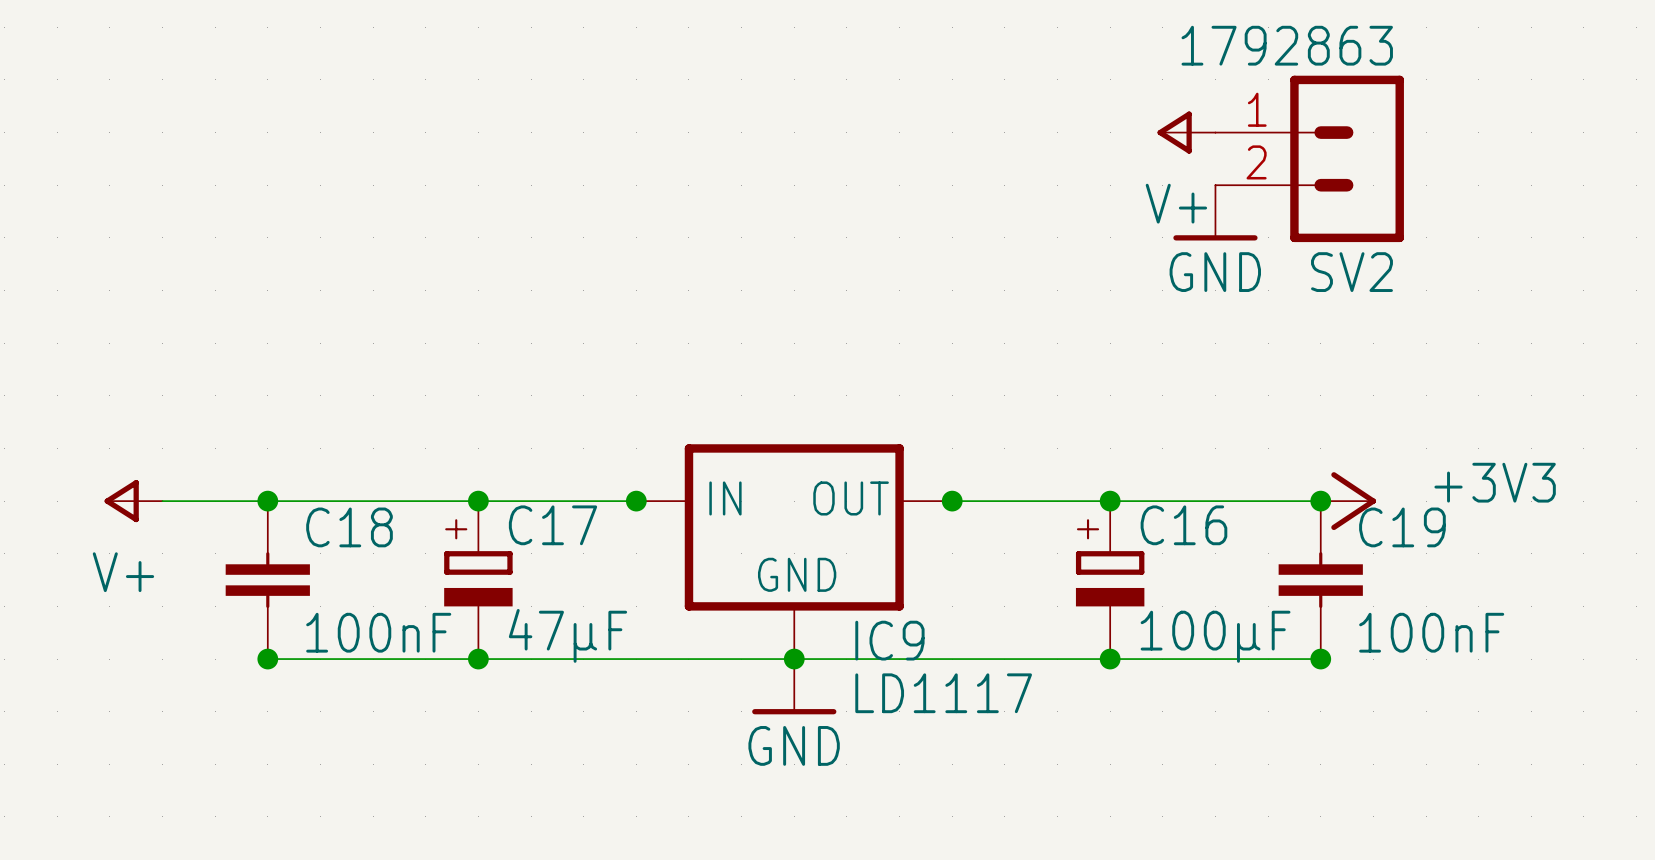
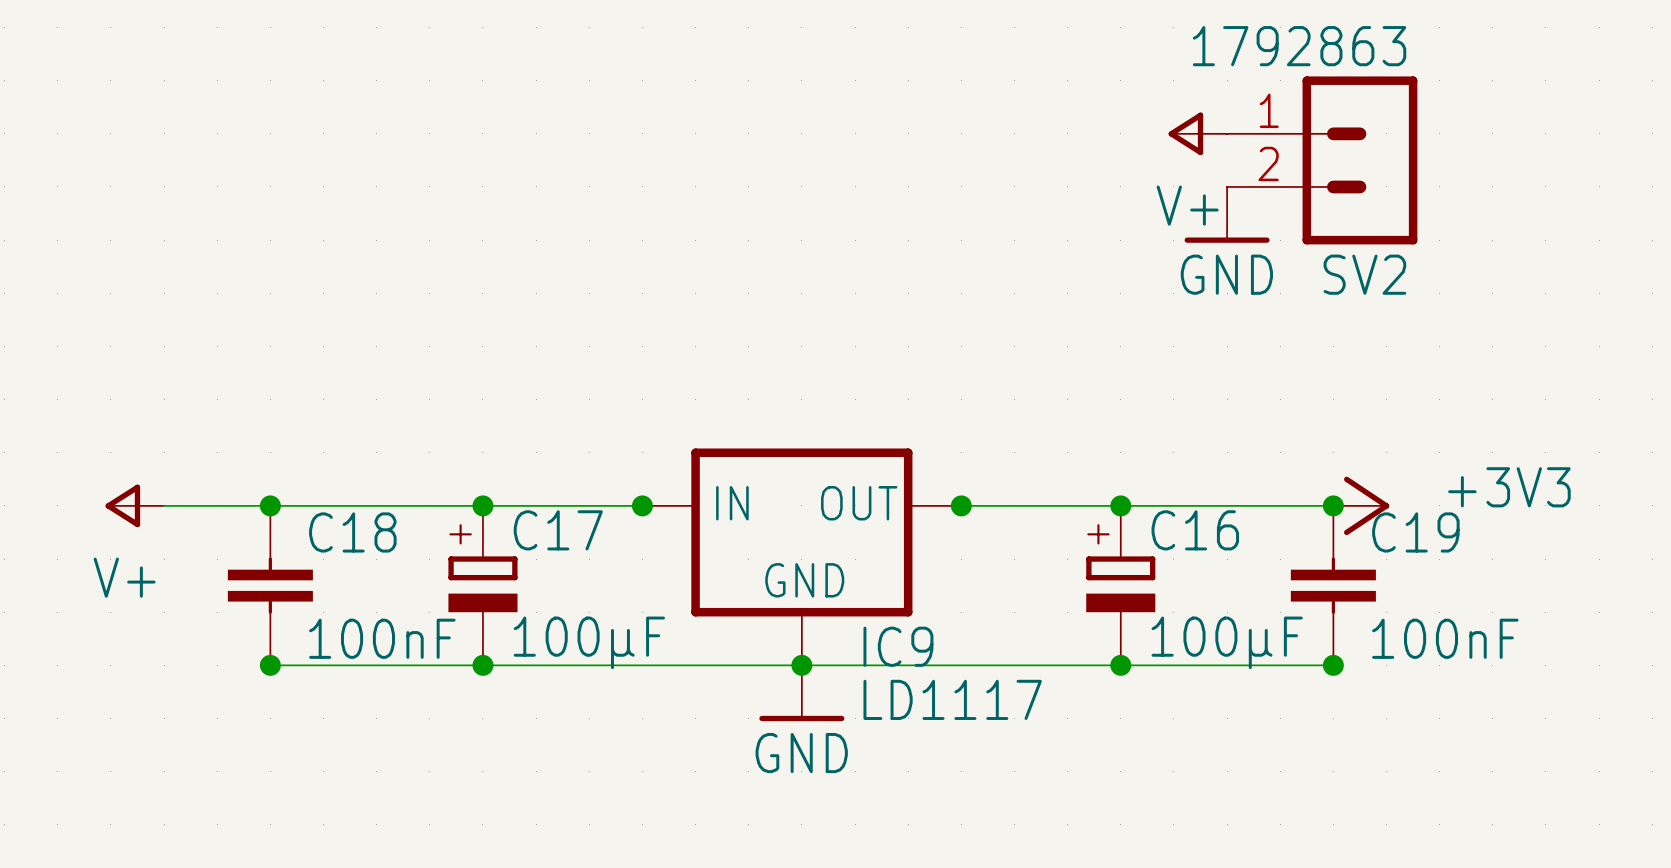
C17 value: 47µF (567, 635) -> 100µF (589, 642)

